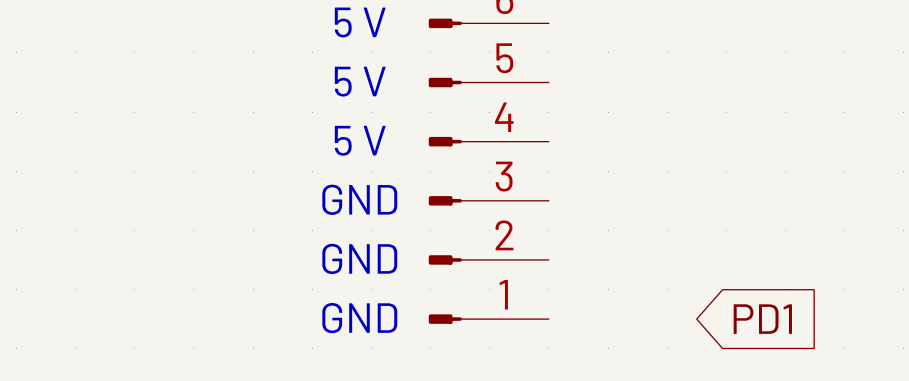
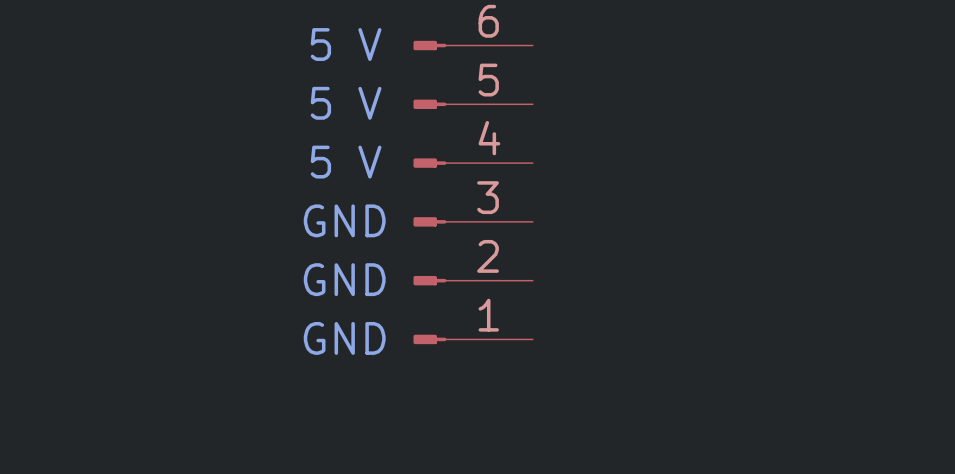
global label: PD1 (762, 319) -> none

